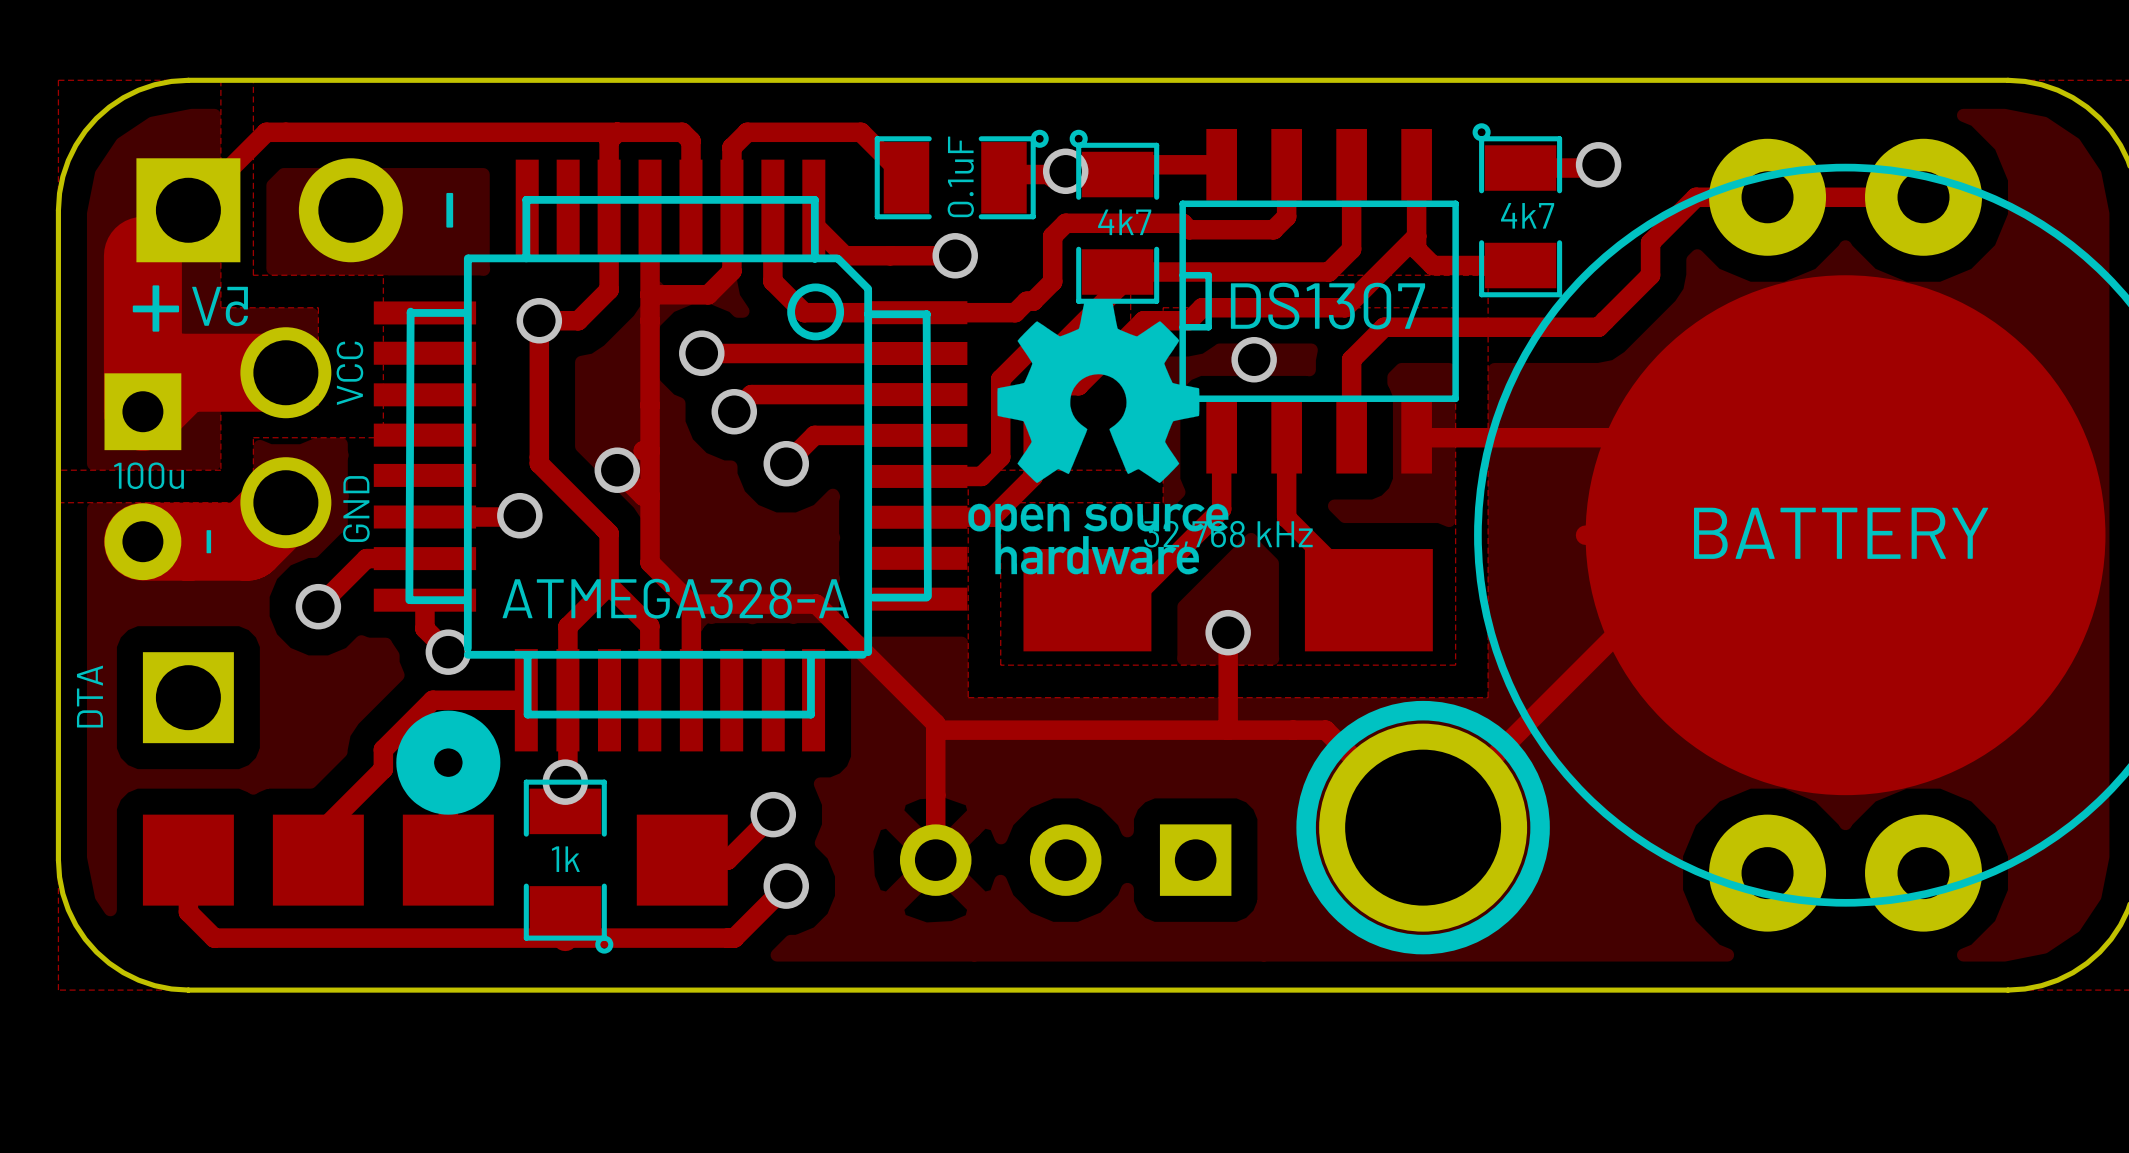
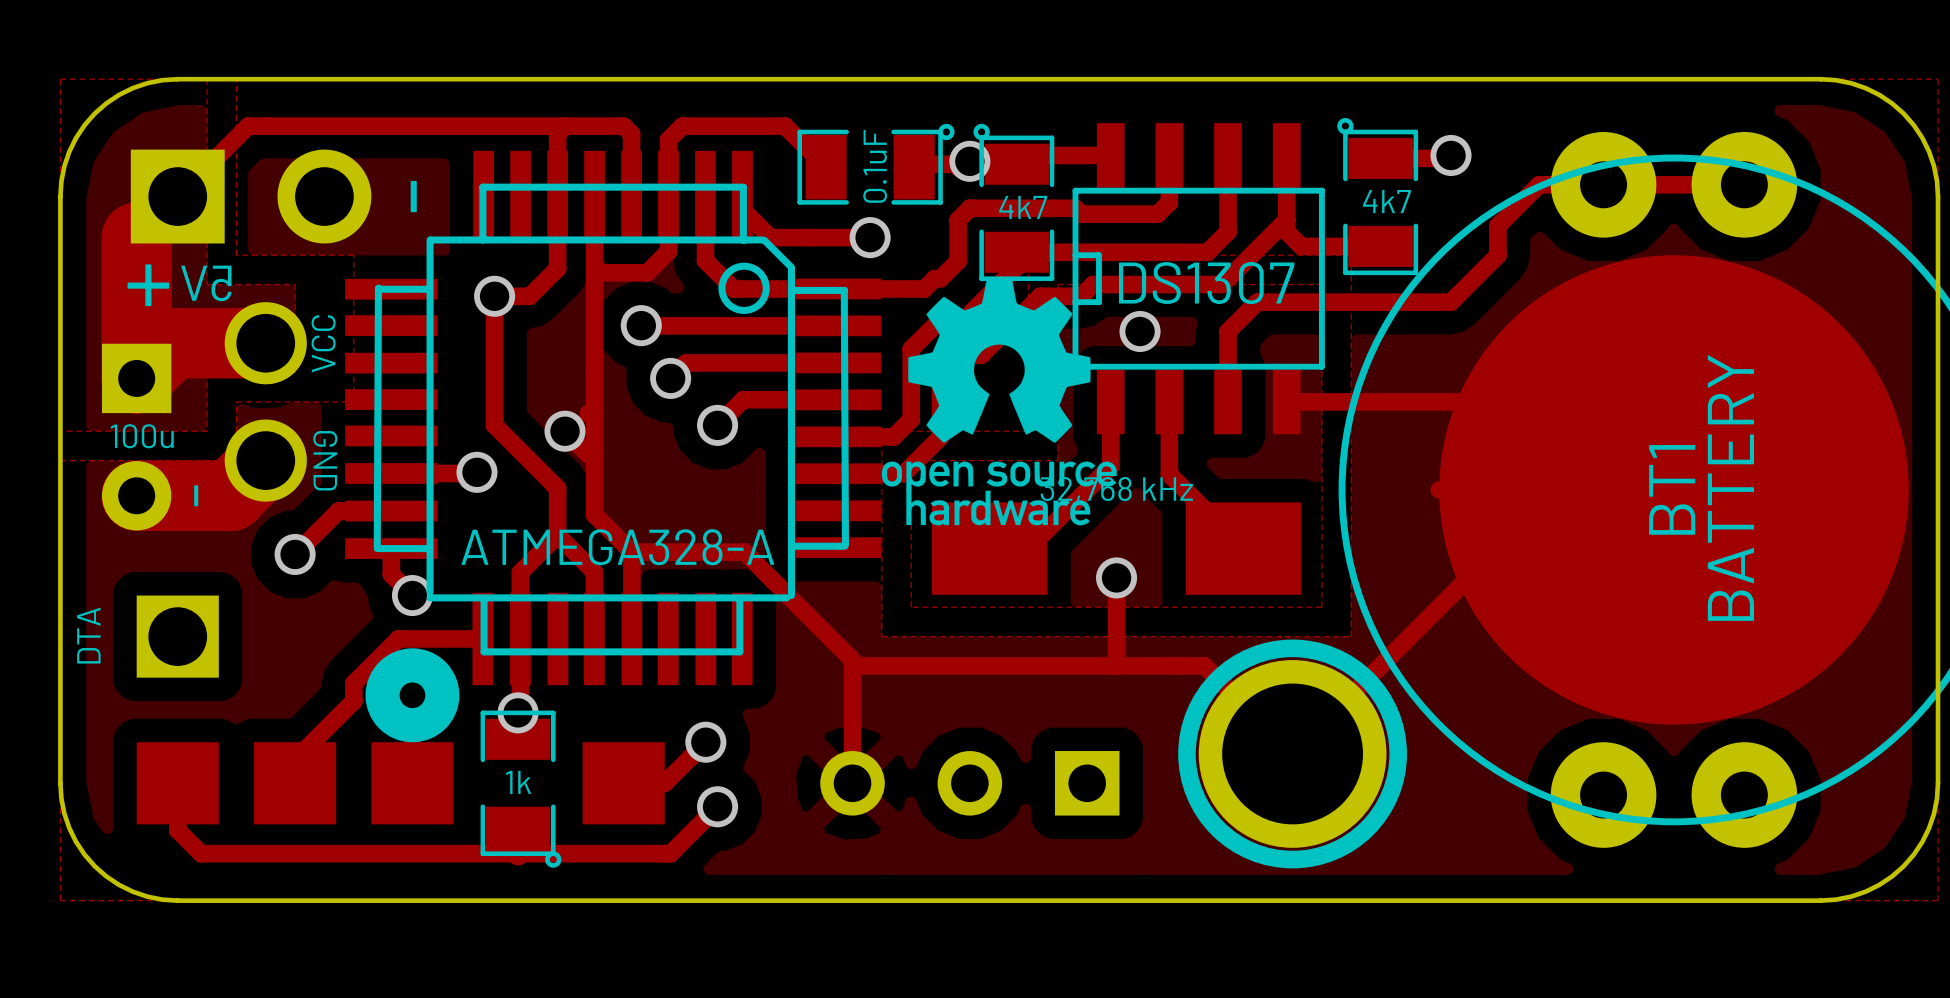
text rotation: 0° (356, 509) -> 180° (325, 460)
BT1 value rotation: 0° (1841, 533) -> 90° counterclockwise (1730, 488)
BT1 name: none -> BT1 (1672, 489)

